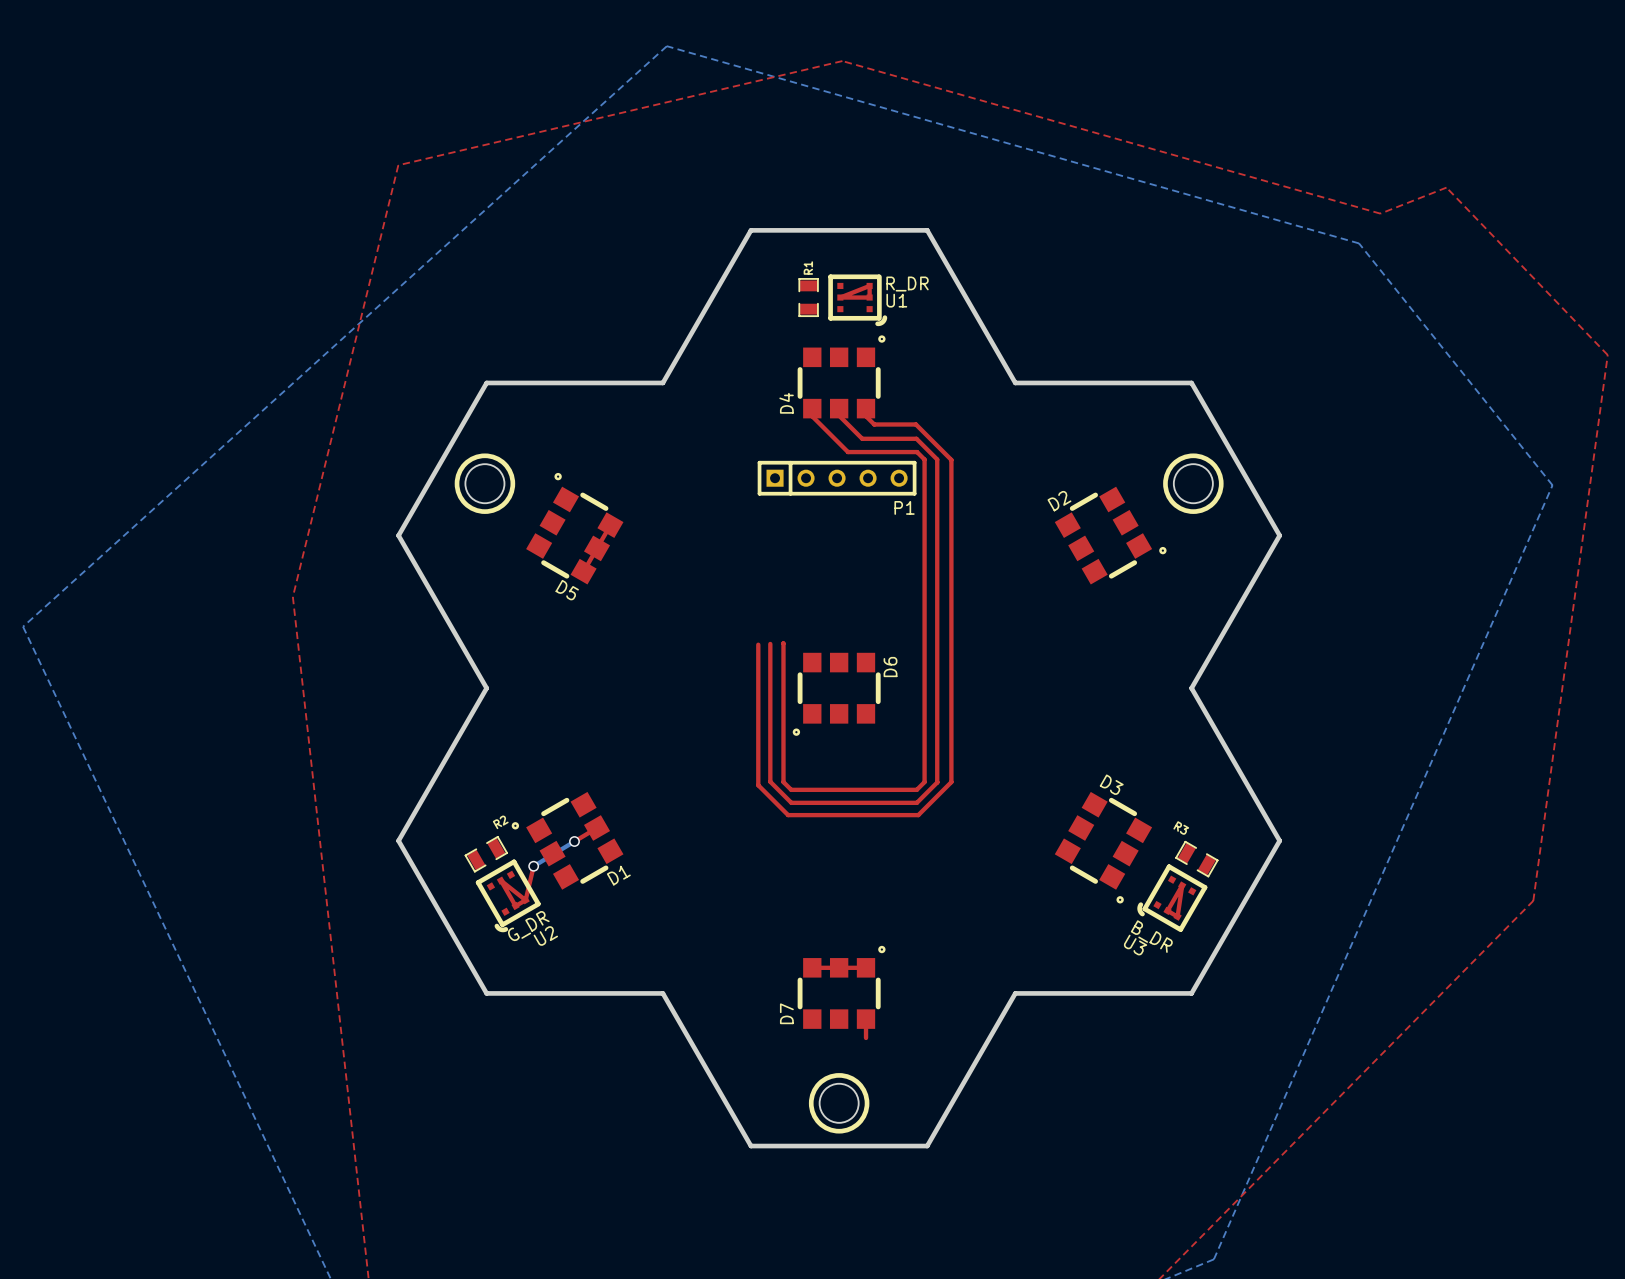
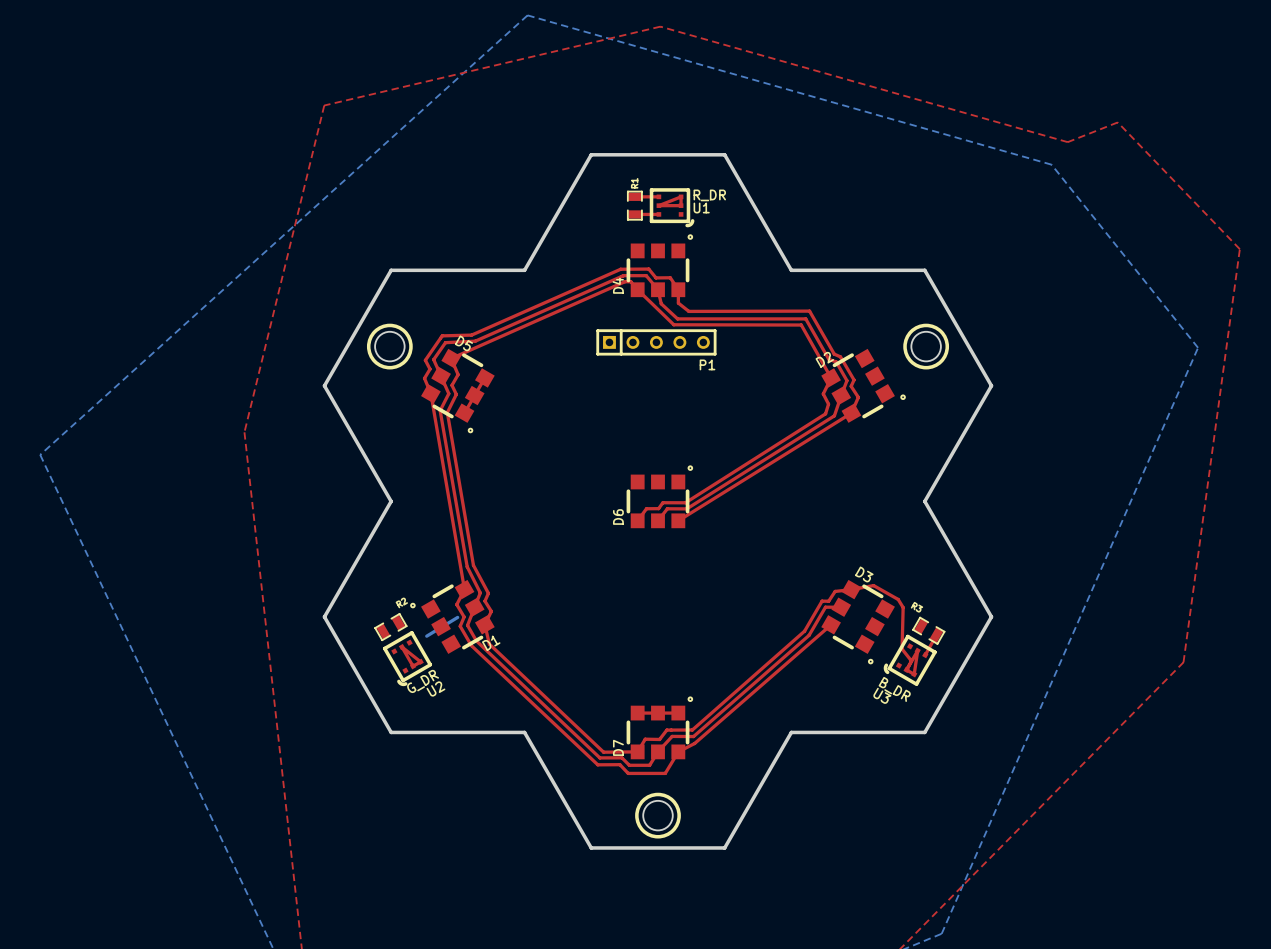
top track: none -> (634, 196) (658, 196)
top track: none -> (634, 214) (658, 214)
top track: (812, 408) (812, 416) (848, 452) (917, 452) (924, 459) (924, 782) (916, 789) (791, 789) (783, 782) (783, 643) -> none
top track: (839, 408) (839, 415) (862, 438) (916, 438) (937, 459) (937, 782) (916, 802) (791, 802) (770, 781) (770, 643) -> none
top track: (866, 408) (866, 416) (874, 424) (915, 424) (951, 459) (951, 782) (918, 815) (788, 815) (758, 785) (758, 644) -> none
D5 rotation: 0° (574, 528) -> 180° (457, 391)
D6 rotation: 0° (836, 694) -> 180° (659, 496)
top track: none -> (637, 520) (646, 508) (658, 508) (662, 502) (685, 502) (825, 413) (828, 404) (823, 393) (831, 377) (801, 325) (673, 324) (630, 281) (625, 281) (451, 358) (458, 374) (451, 385) (456, 394) (447, 412) (473, 565) (488, 593) (484, 601) (491, 611) (484, 624) (489, 644) (603, 752) (637, 751) (645, 739) (659, 739) (666, 730) (692, 729) (804, 631) (822, 601) (828, 601) (835, 591) (873, 585) (898, 599) (903, 607) (902, 649) (911, 661) (906, 669)
top track: none -> (658, 520) (667, 508) (686, 508) (834, 415) (846, 380) (836, 361) (828, 359) (805, 318) (677, 318) (661, 303) (658, 289) (646, 275) (623, 275) (475, 341) (445, 342) (433, 359) (448, 393) (440, 410) (467, 566) (480, 592) (467, 625) (476, 640) (599, 757) (621, 757) (629, 765) (649, 765) (658, 751) (672, 736) (693, 736) (809, 635) (825, 607) (841, 607)
top track: none -> (678, 520) (851, 413) (858, 397) (851, 386) (854, 380) (840, 356) (834, 354) (809, 311) (688, 311) (678, 303) (678, 289) (670, 277) (656, 277) (648, 269) (620, 269) (471, 335) (442, 335) (425, 360) (430, 369) (424, 378) (430, 393) (464, 589) (456, 604) (464, 616) (460, 626) (471, 645) (597, 764) (619, 764) (628, 773) (665, 773) (678, 751) (694, 743) (831, 624)
top track: (597, 828) (574, 841) -> none
via: (574, 841) -> none
top track: none -> (936, 635) (925, 655)
top track: (533, 866) (525, 900) -> none
via: (533, 866) -> none
top track: (866, 1019) (866, 1037) -> none

